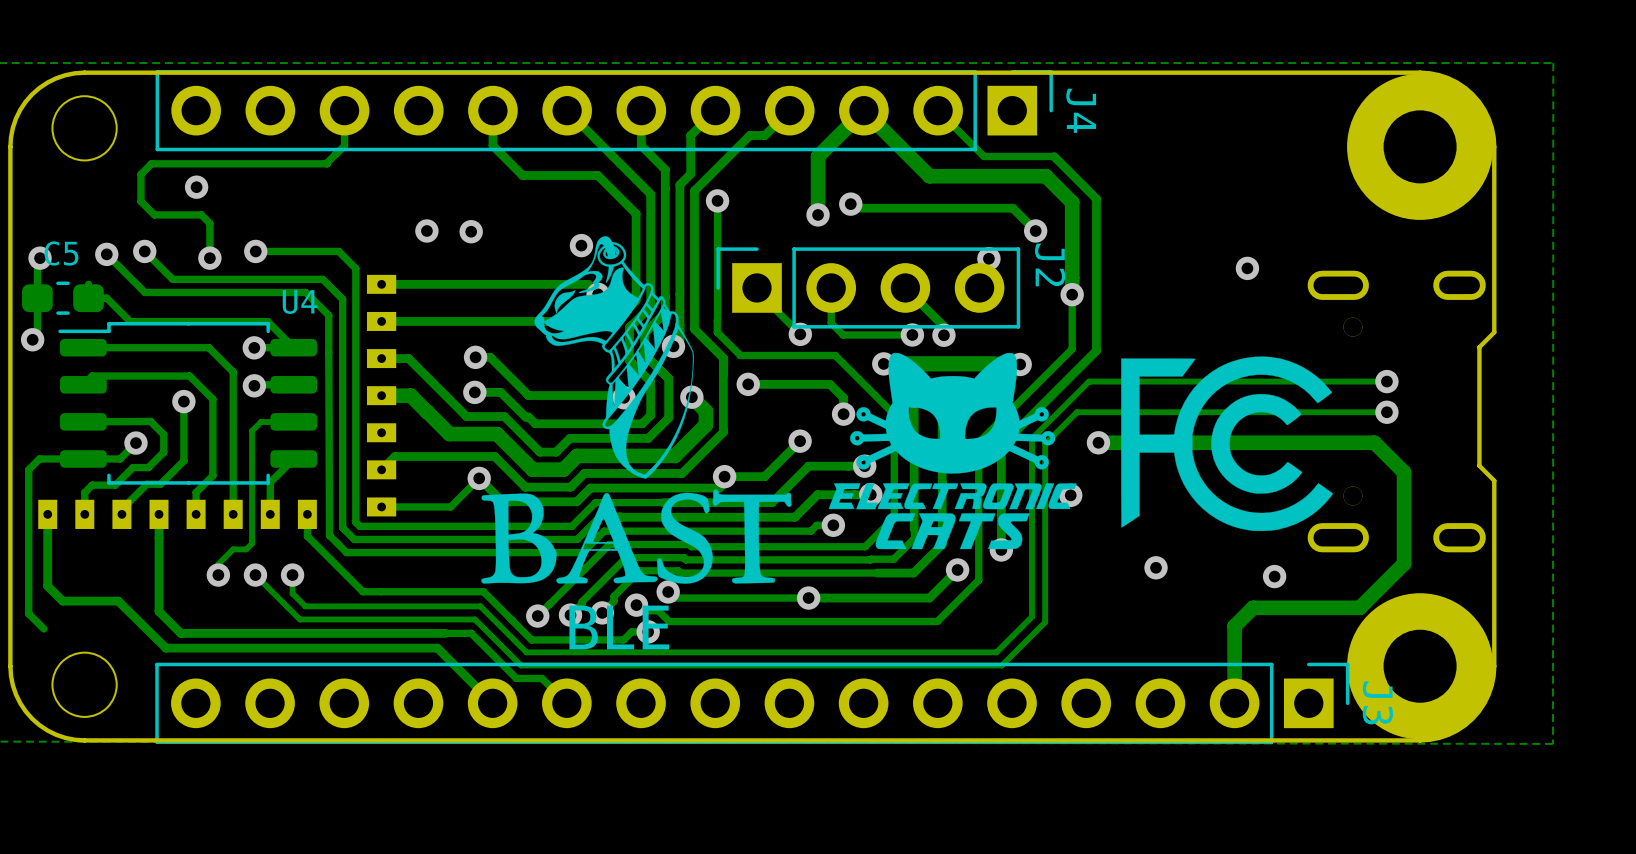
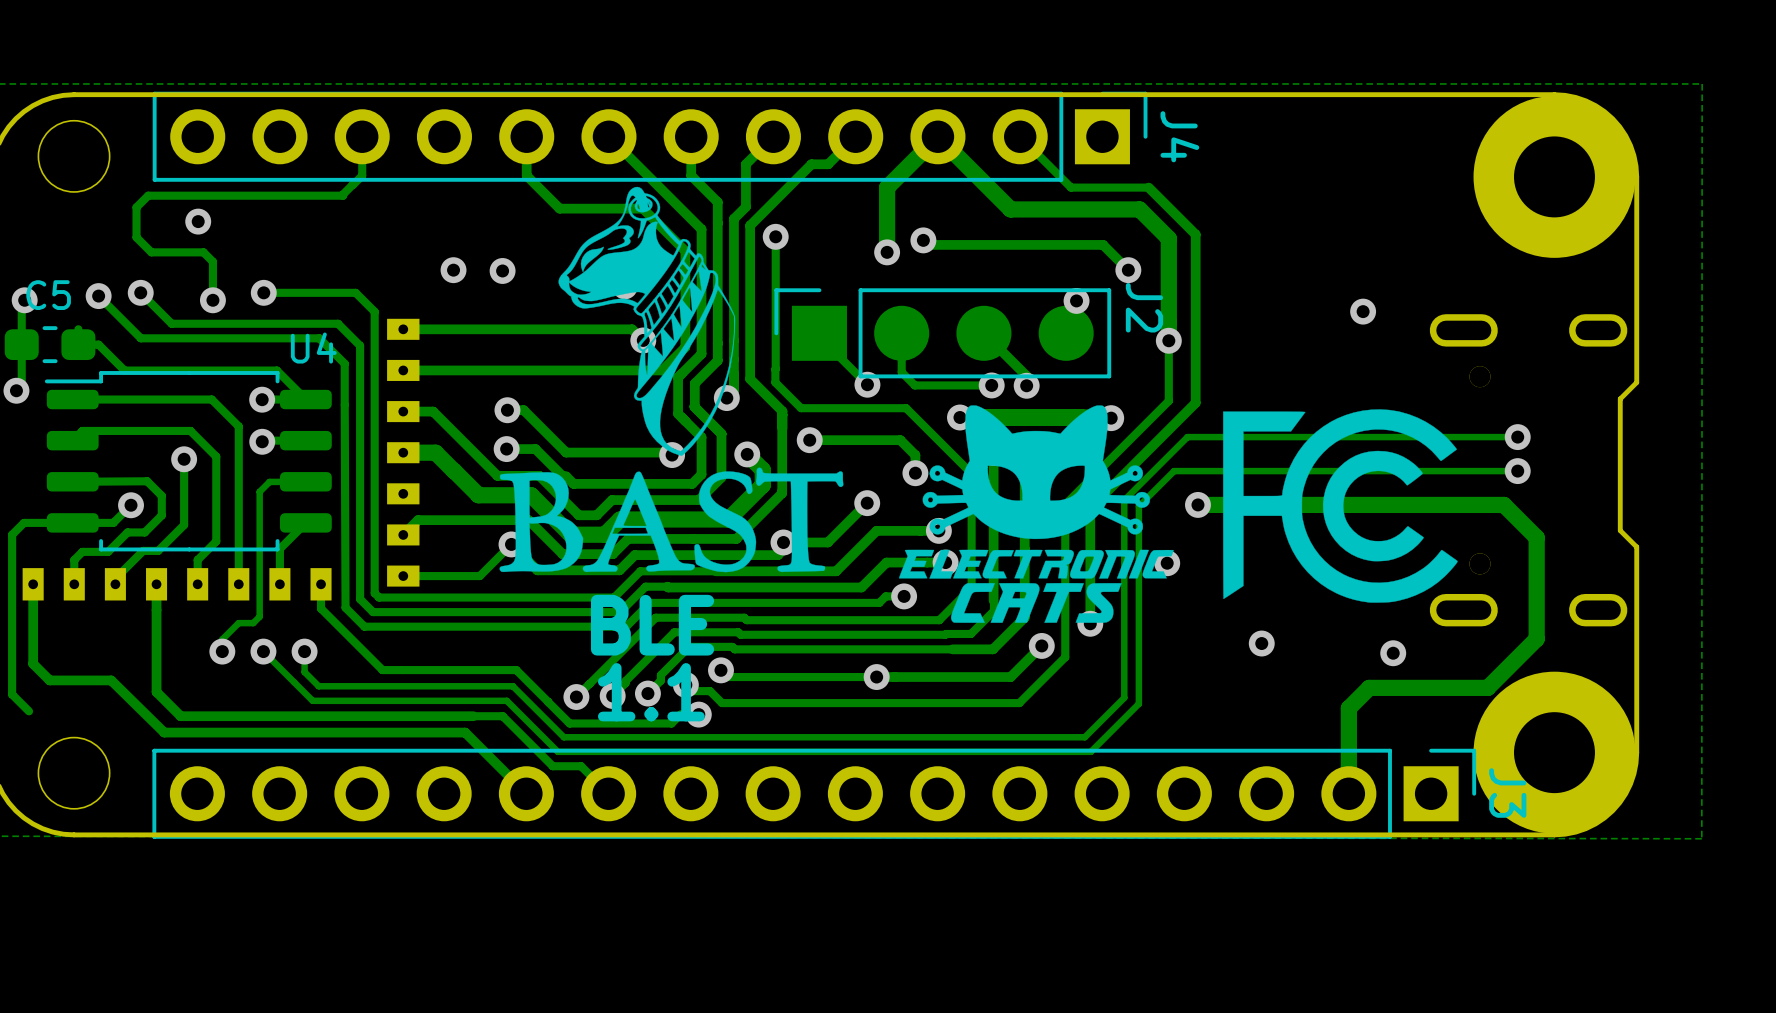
J2 footprint: [716, 247, 1021, 329] -> [774, 288, 1112, 379]
drawing position: (636, 409) -> (671, 379)
text: none -> BLE (652, 625)
text: BLE (619, 627) -> 1.1 (651, 692)

